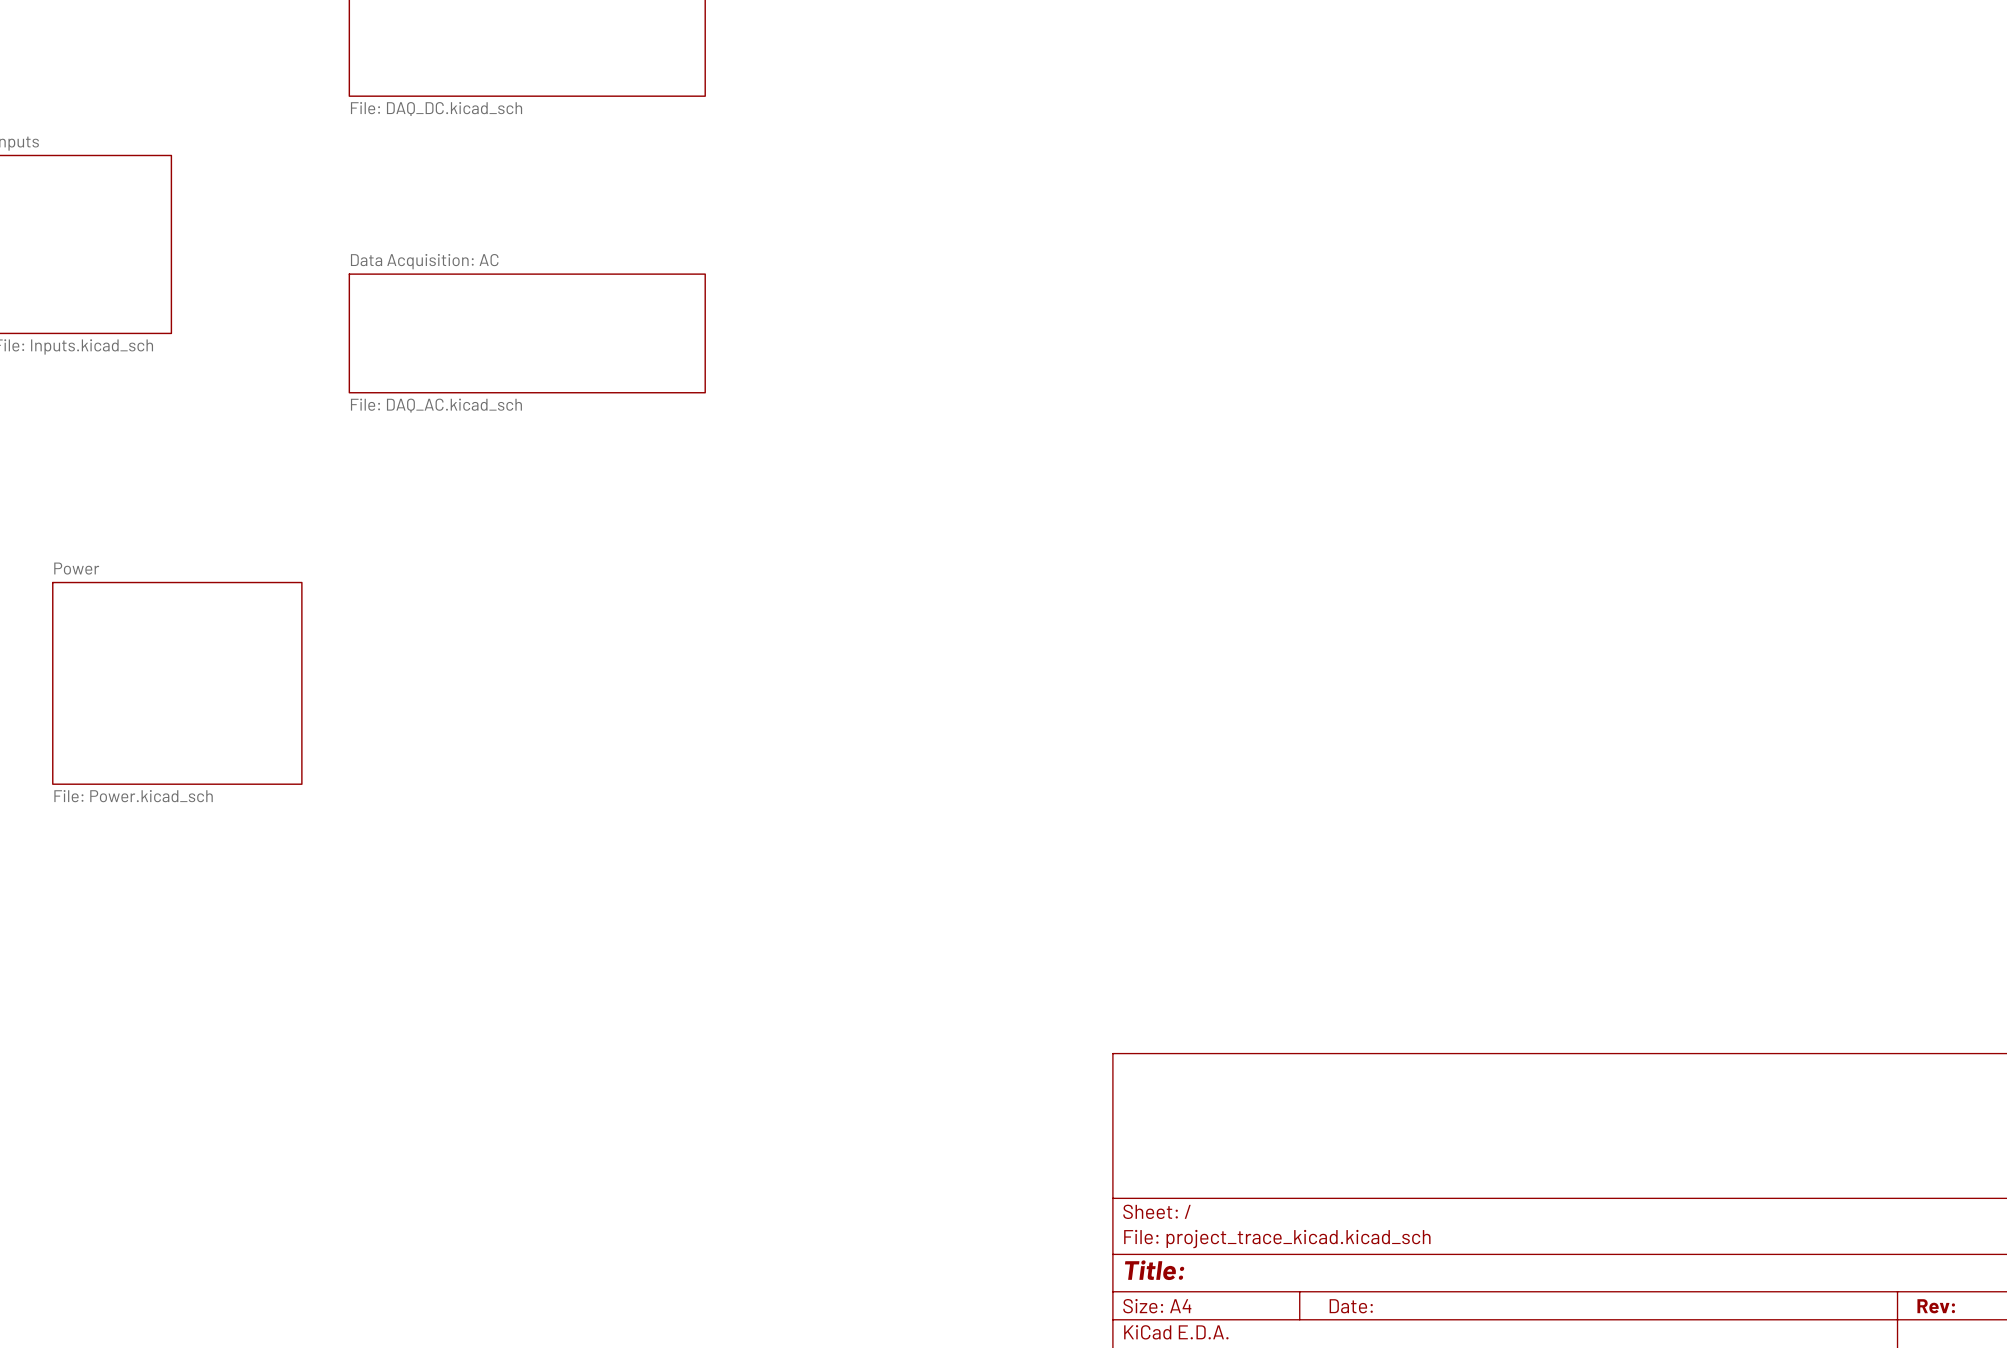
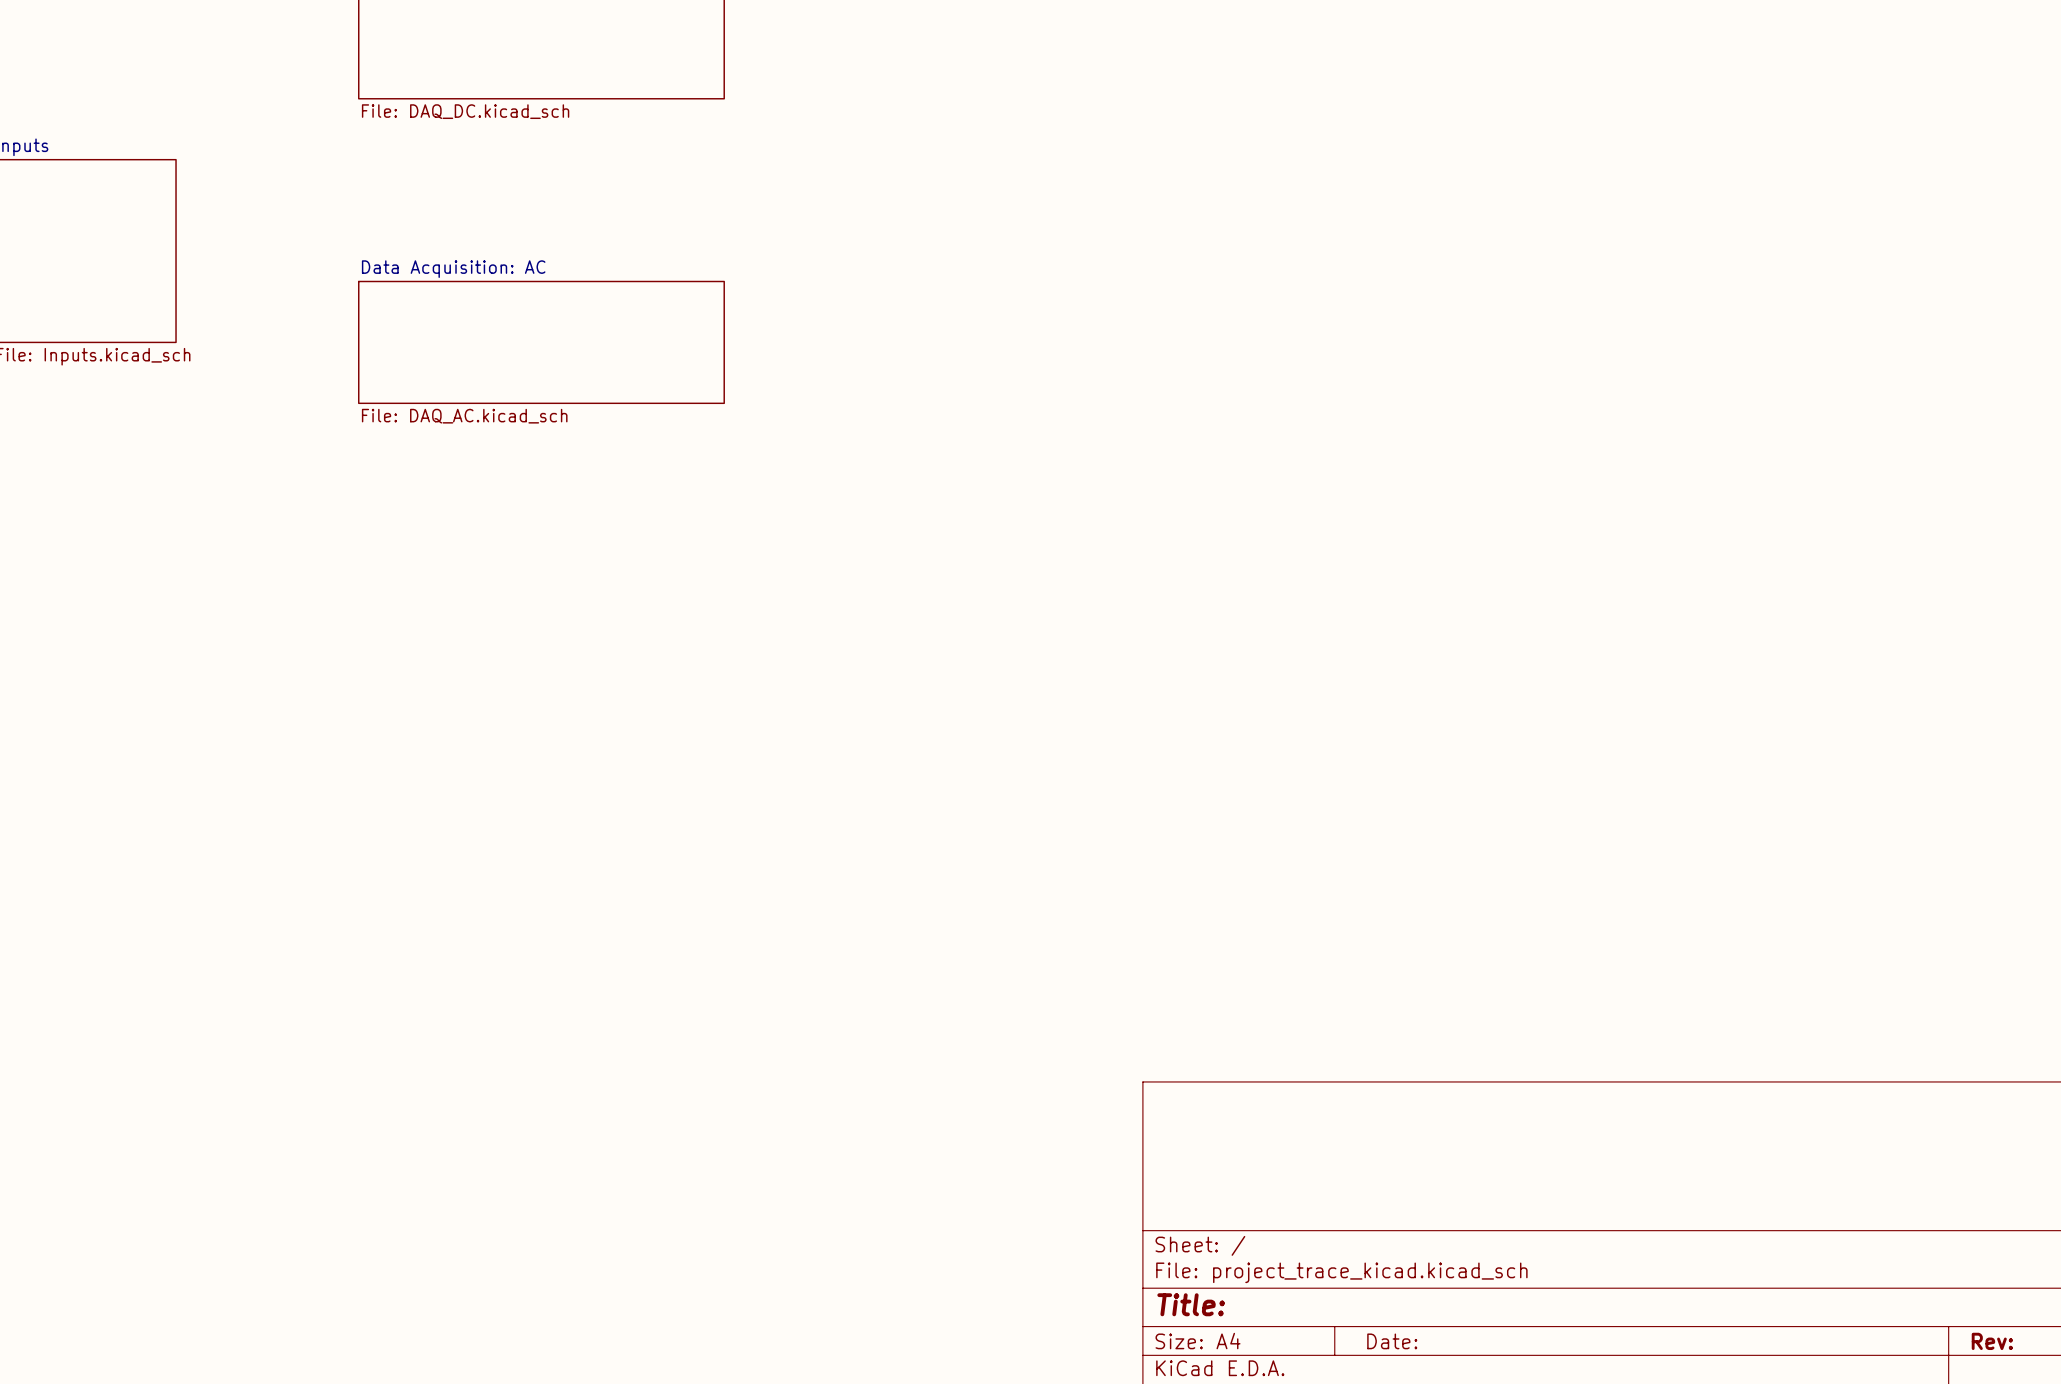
sheet Power: File: Power.kicad_sch (177, 683) -> none

